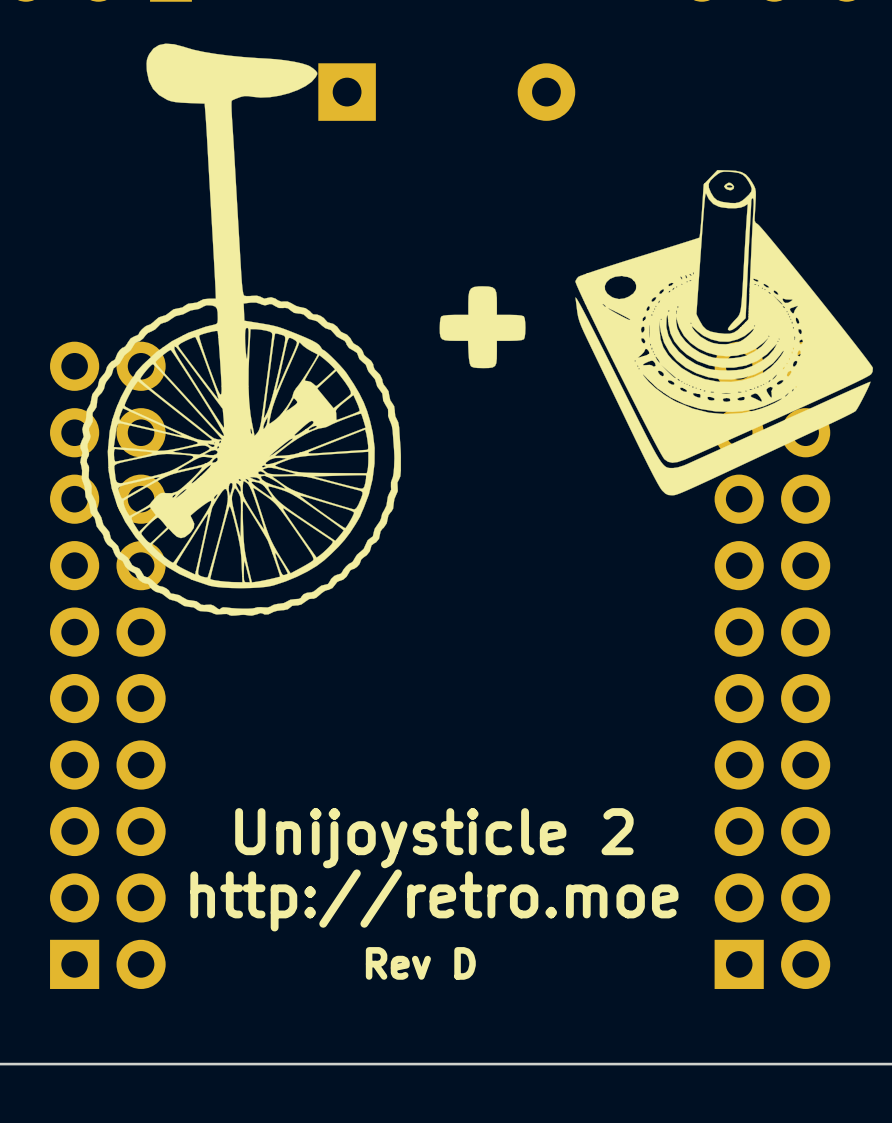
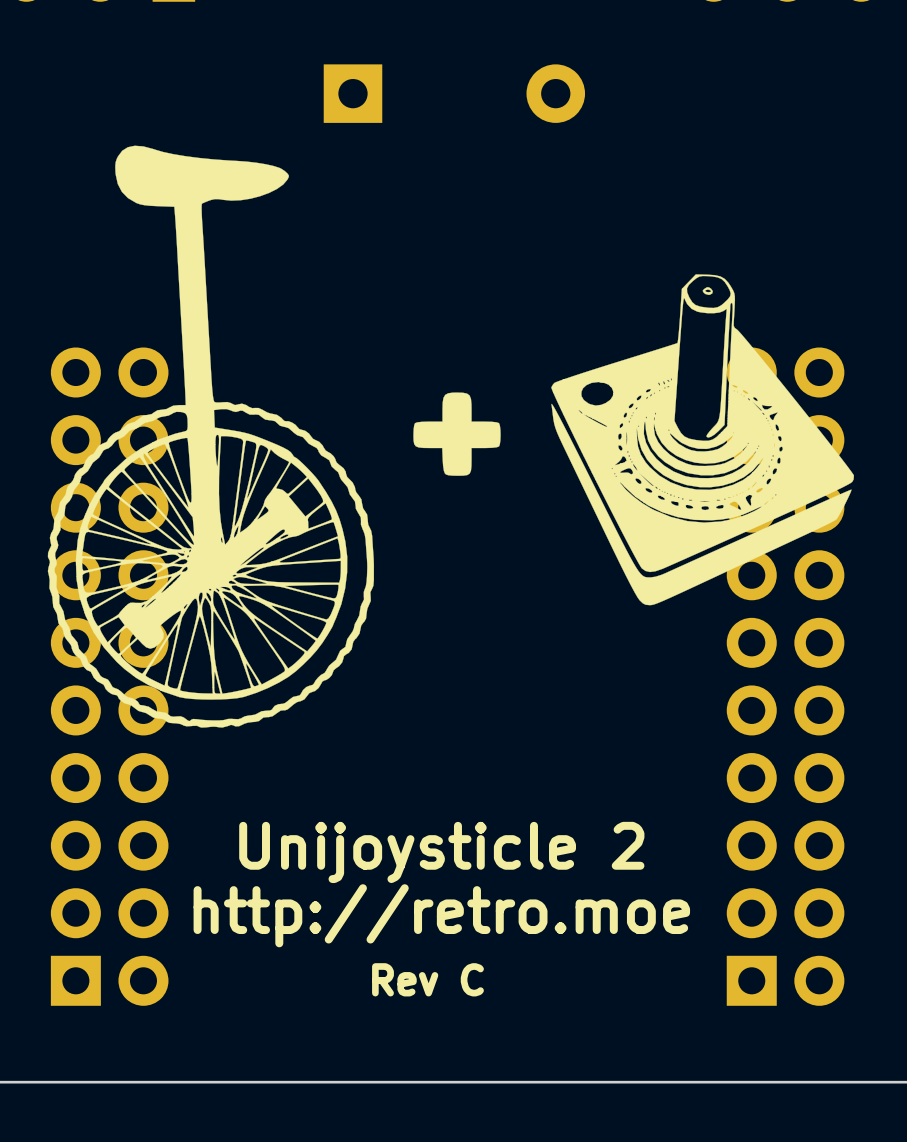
drawing position: (476, 329) -> (450, 436)
text: Rev D (420, 963) -> Rev C (427, 979)

